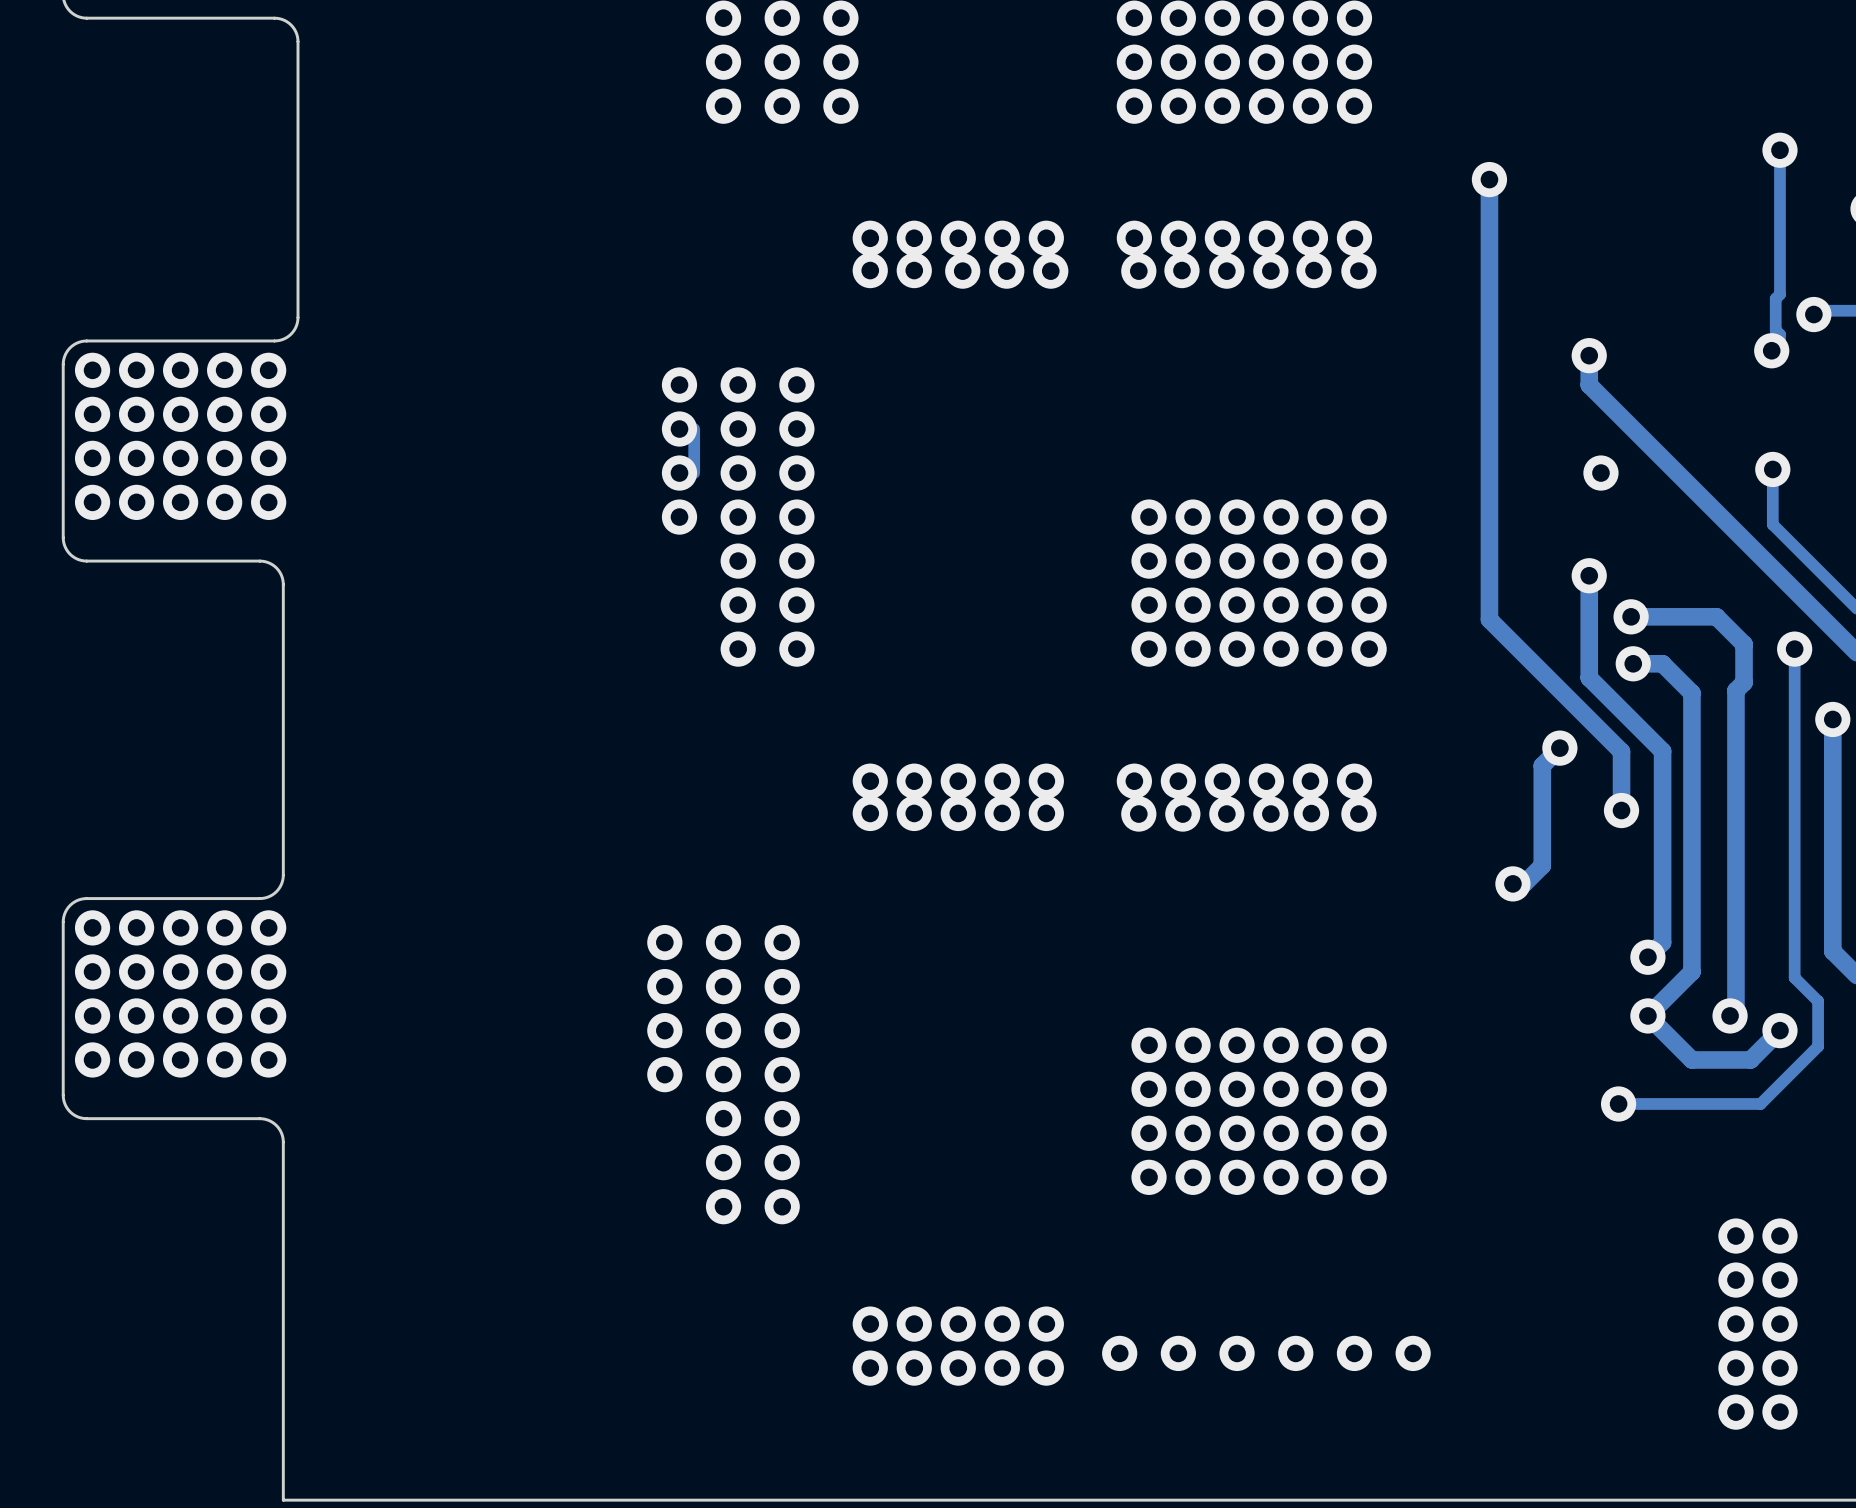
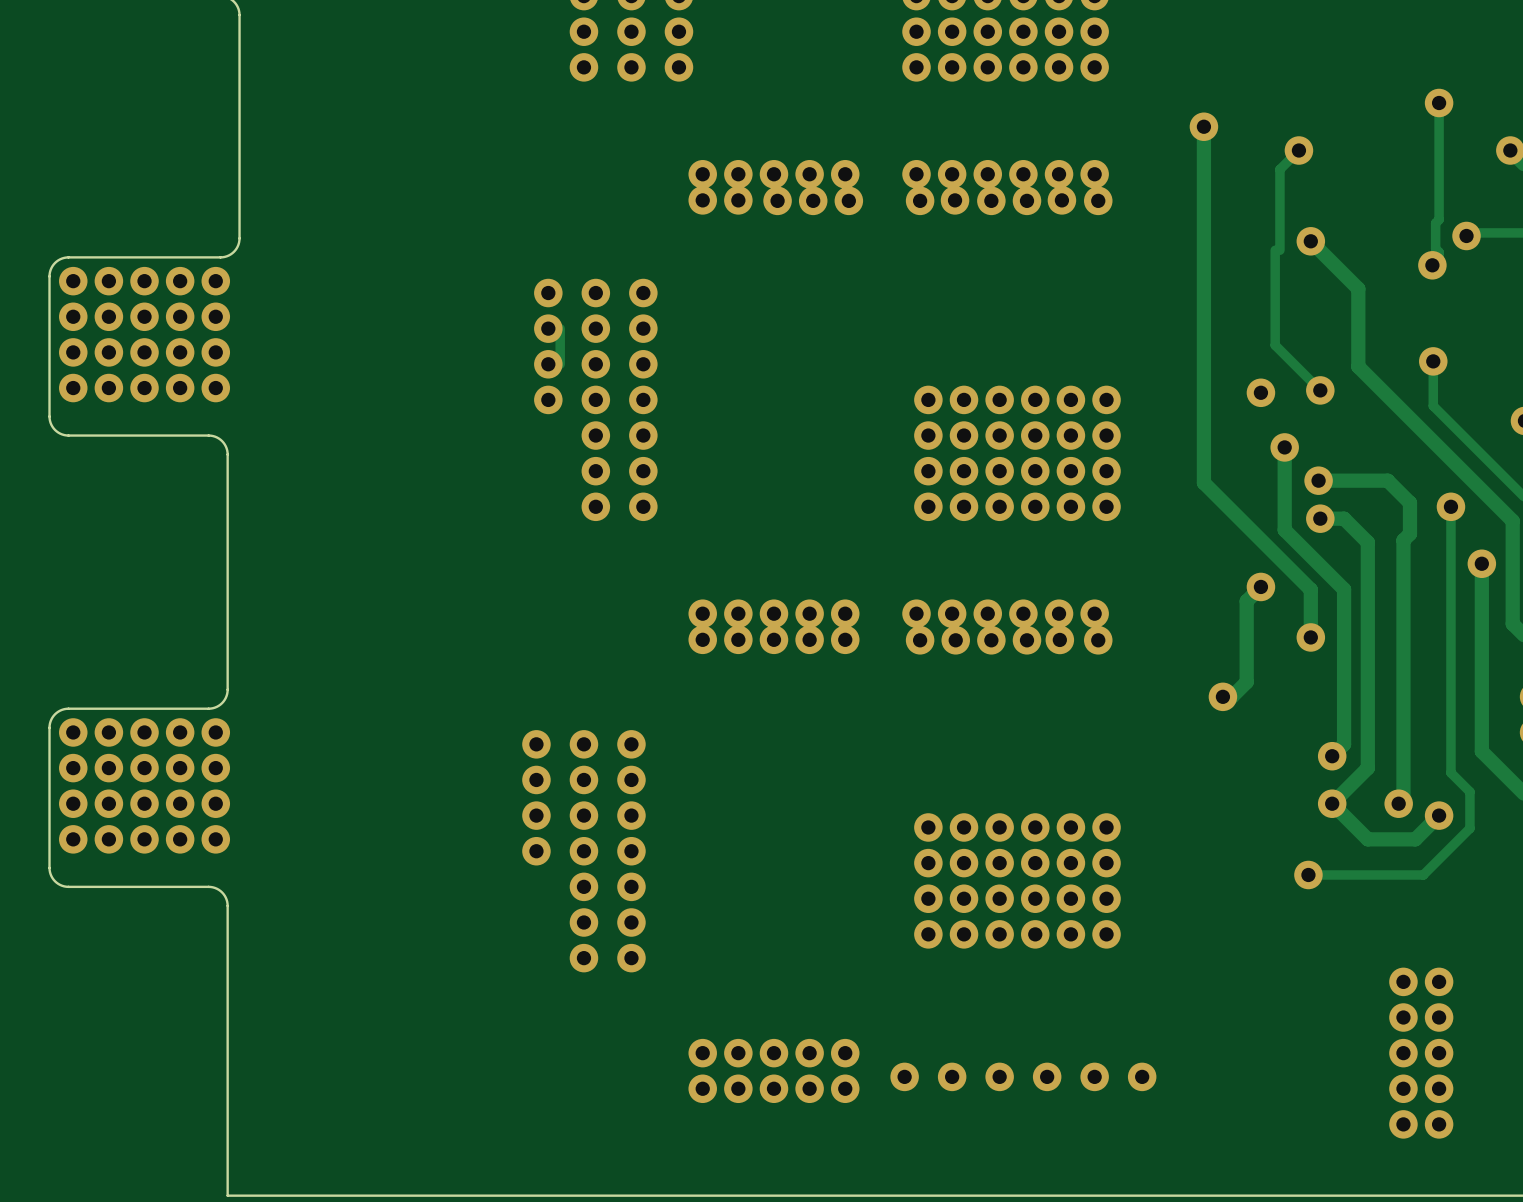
track: none -> (1298, 150) (1279, 169) (1279, 250)
via: none -> (1298, 150)
track: none -> (1275, 250) (1275, 345) (1320, 390)
track: (1589, 355) (1589, 385) (1680, 475) -> (1310, 241) (1358, 288) (1358, 366)
via position: (1589, 355) -> (1310, 241)
via position: (1600, 473) -> (1320, 390)
via: none -> (1260, 392)

